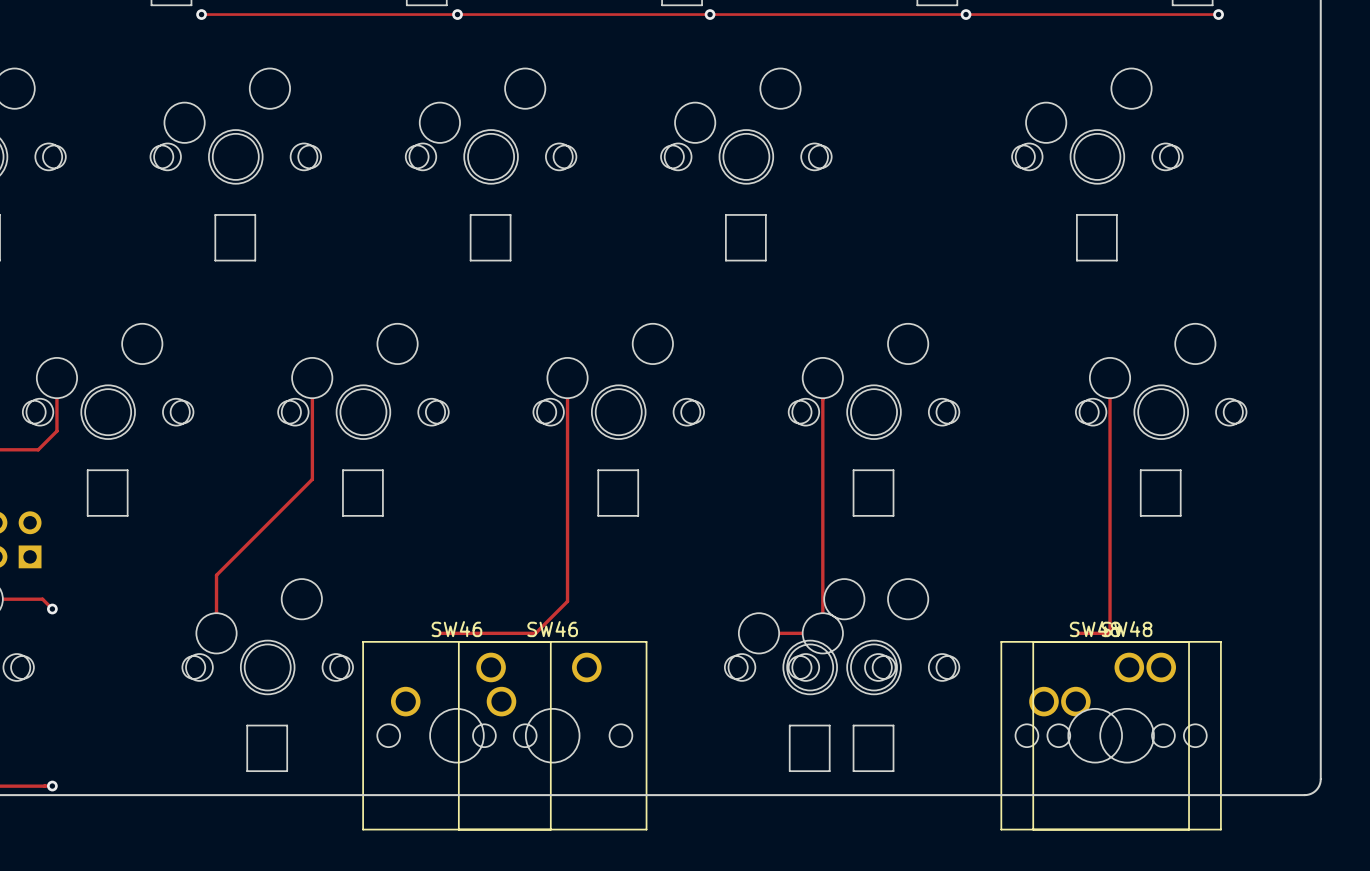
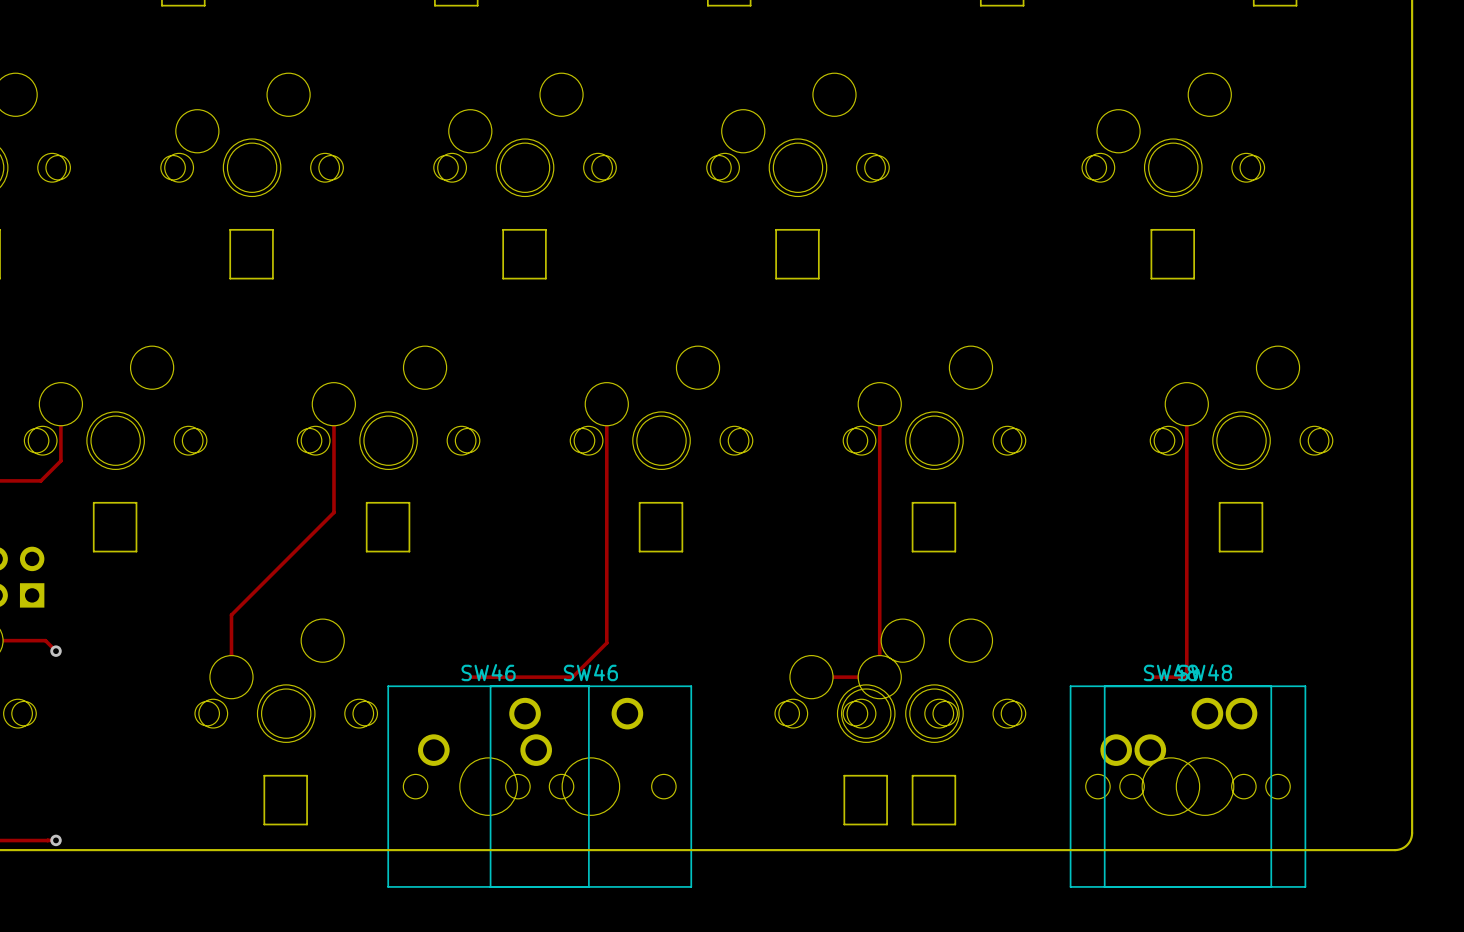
track: (201, 14) (1218, 14) -> none
via: (201, 14) -> none
via: (457, 14) -> none
via: (710, 14) -> none
via: (966, 14) -> none
via: (1218, 14) -> none

